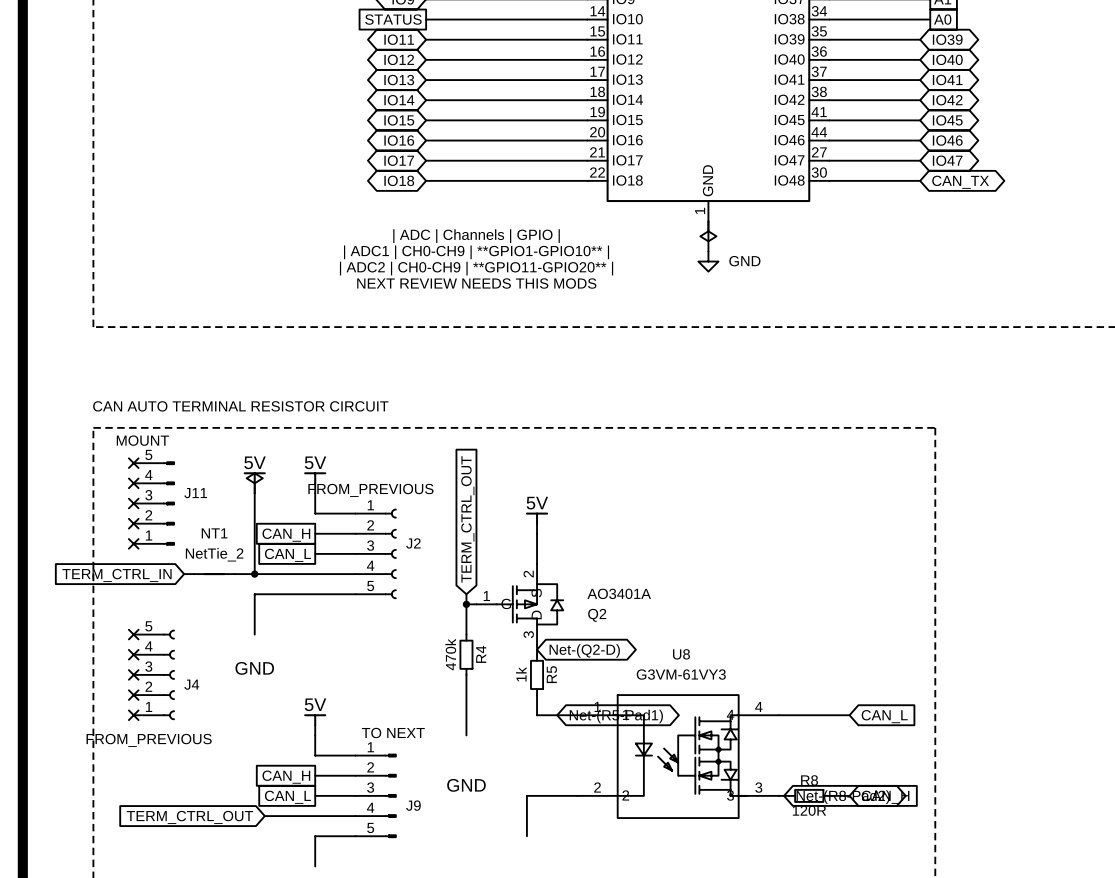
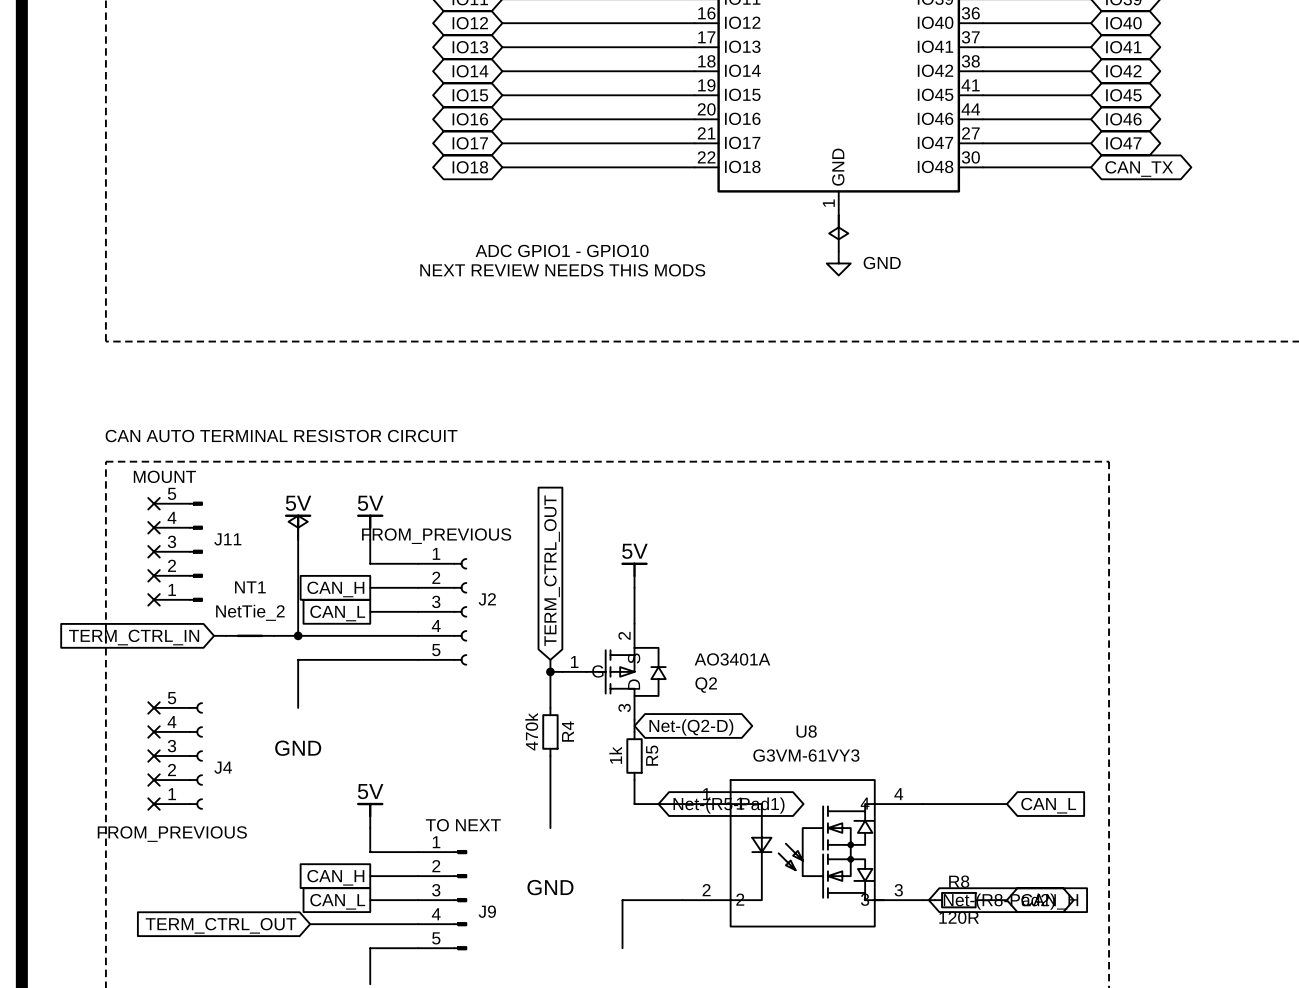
text: | ADC | Channels | GPIO | (476, 236) -> none
text: | ADC1 | CH0-CH9 | **GPIO1-GPIO10** | (476, 252) -> ADC GPIO1 - GPIO10 (562, 250)
text: | ADC2 | CH0-CH9 | **GPIO11-GPIO20** | (476, 268) -> NEXT REVIEW NEEDS THIS MODS (562, 270)
text: NEXT REVIEW NEEDS THIS MODS (476, 283) -> none

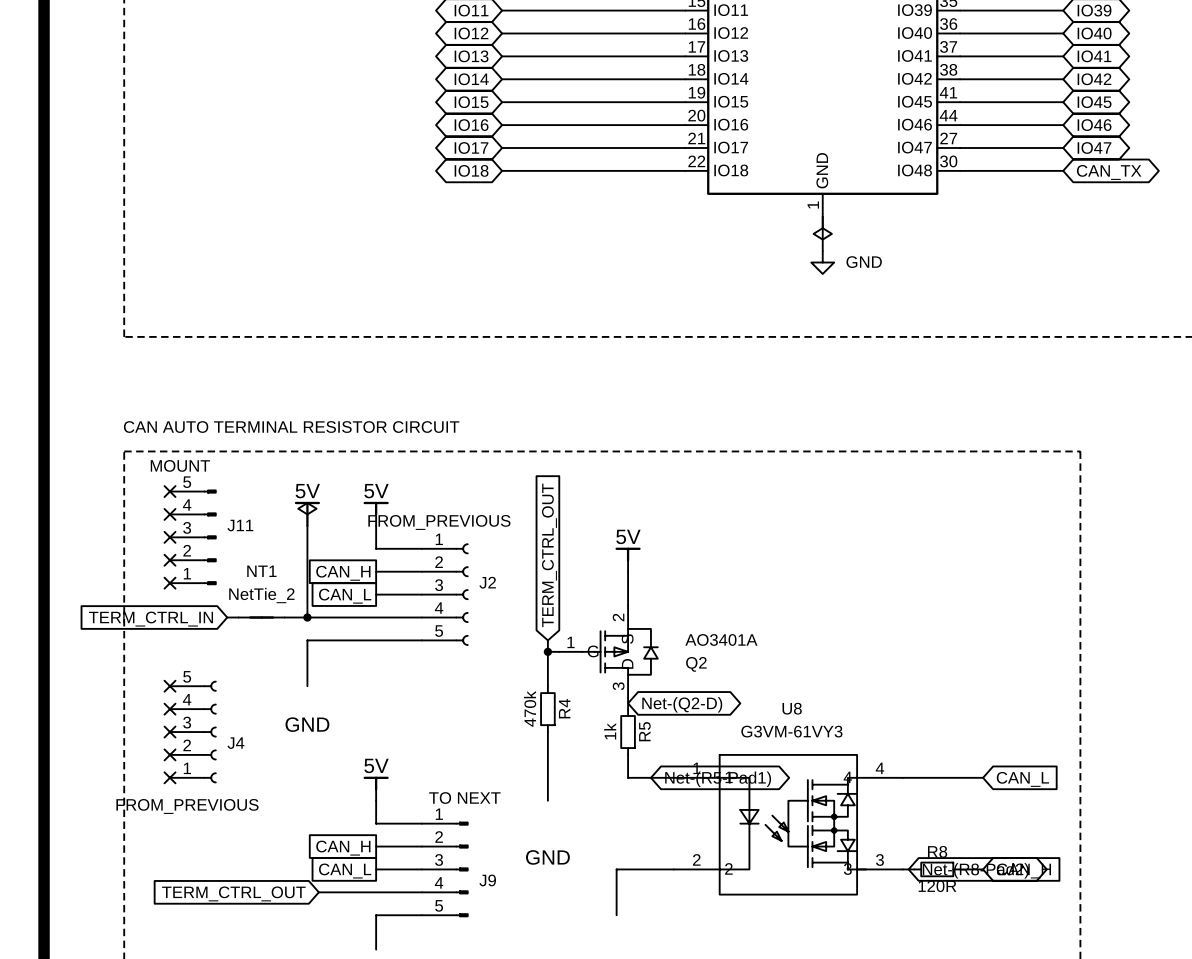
text: ADC GPIO1 - GPIO10 (562, 250) -> none
text: NEXT REVIEW NEEDS THIS MODS (562, 270) -> none

